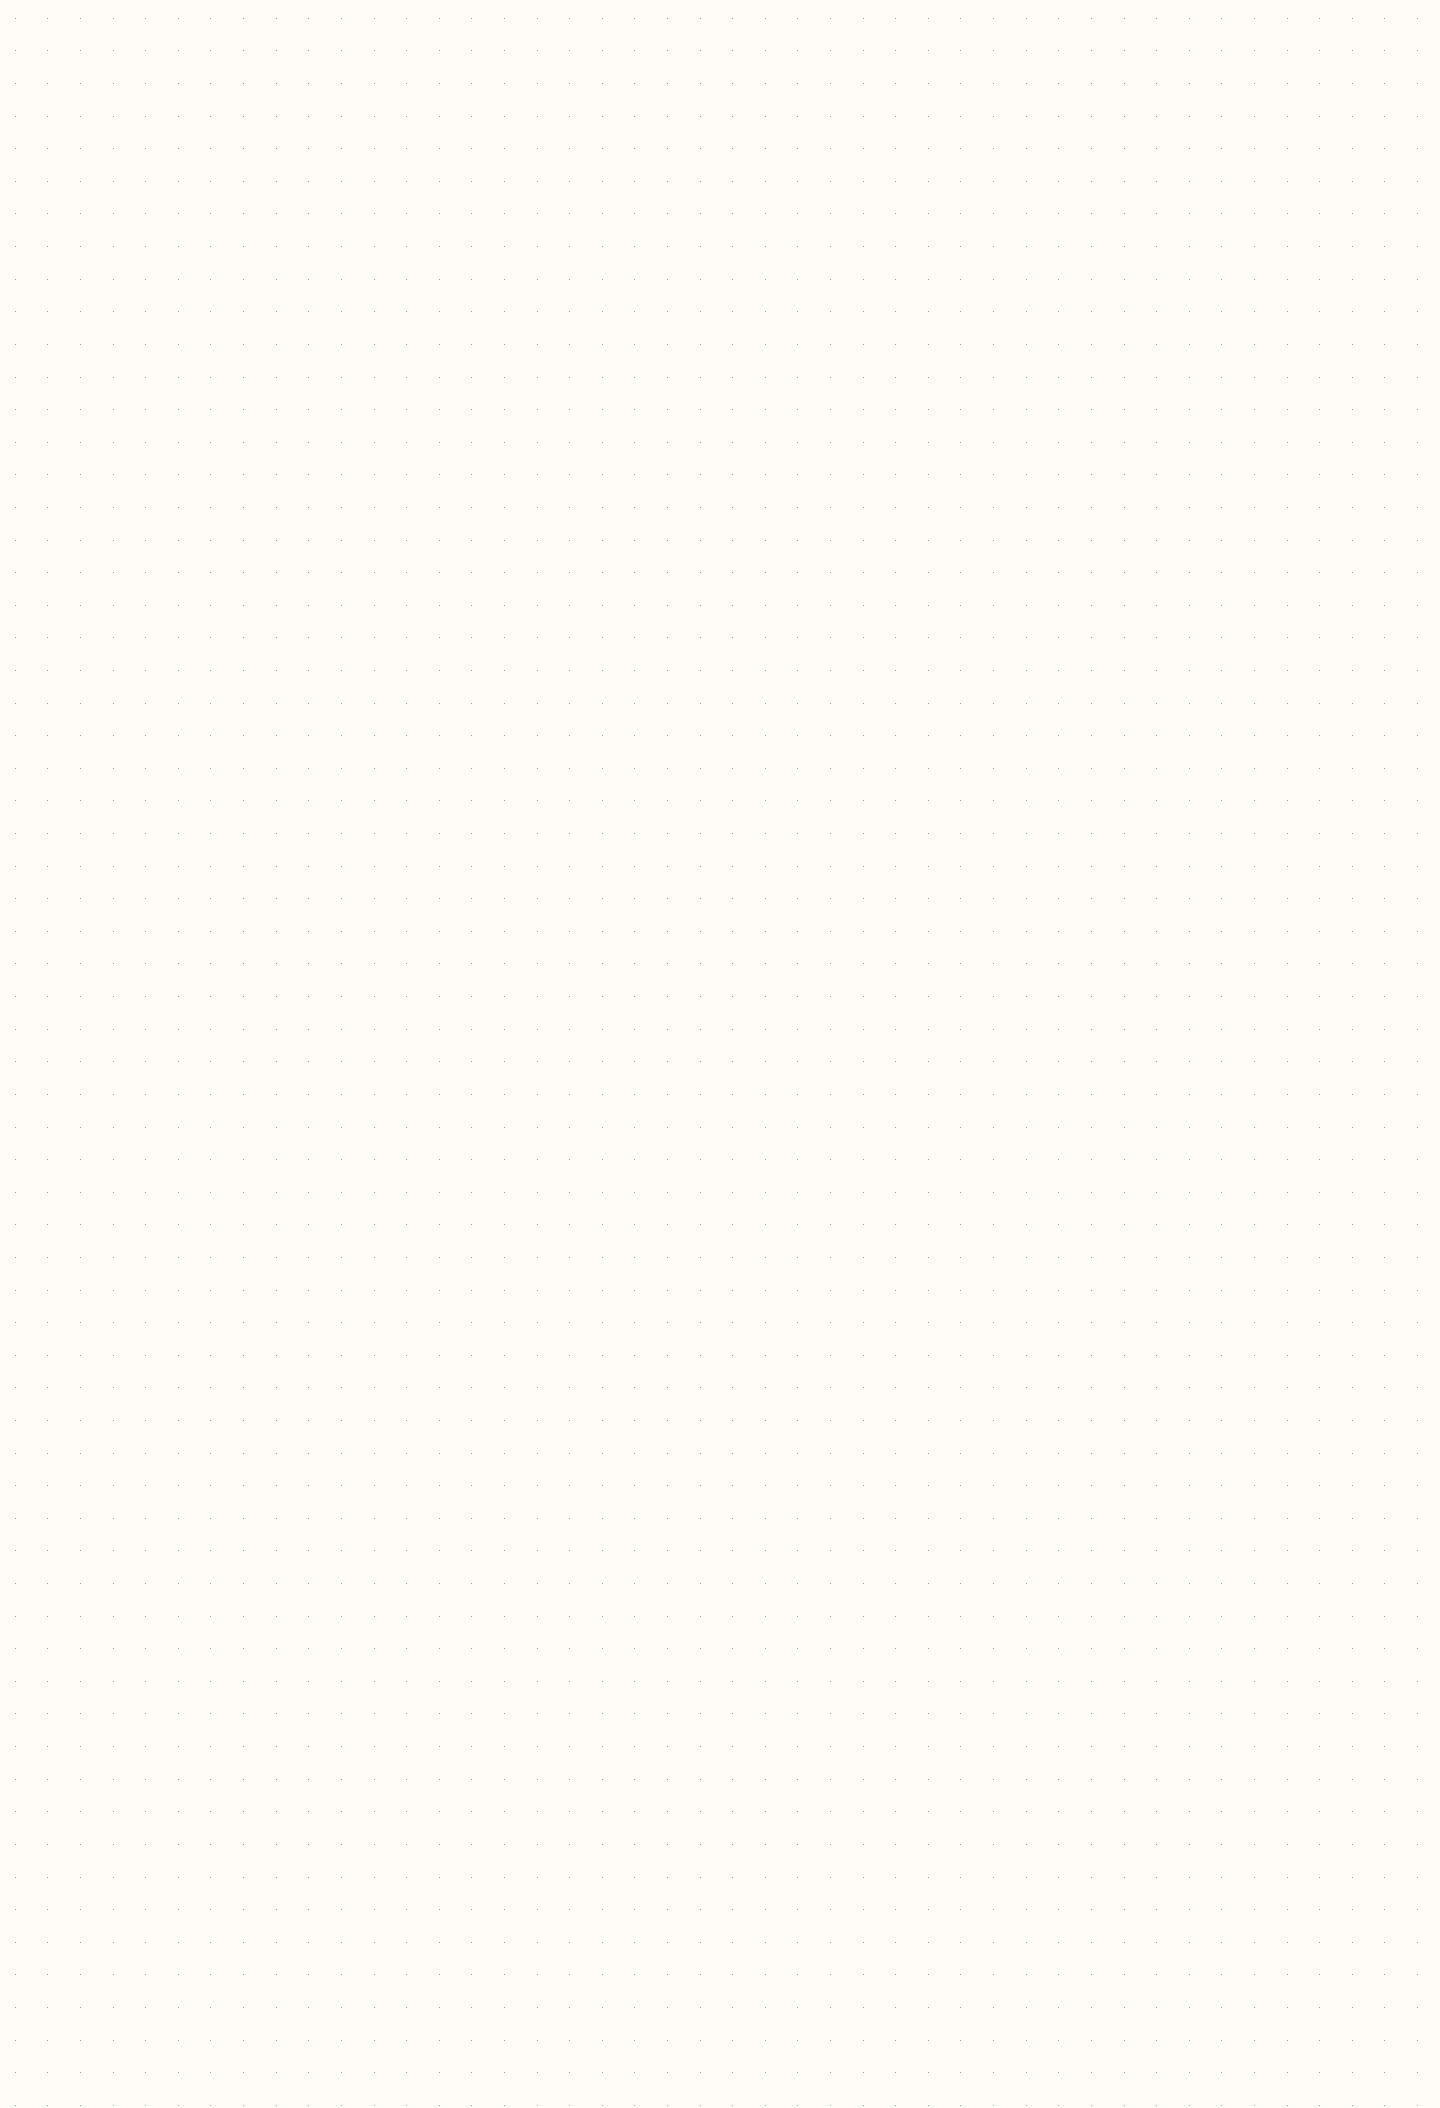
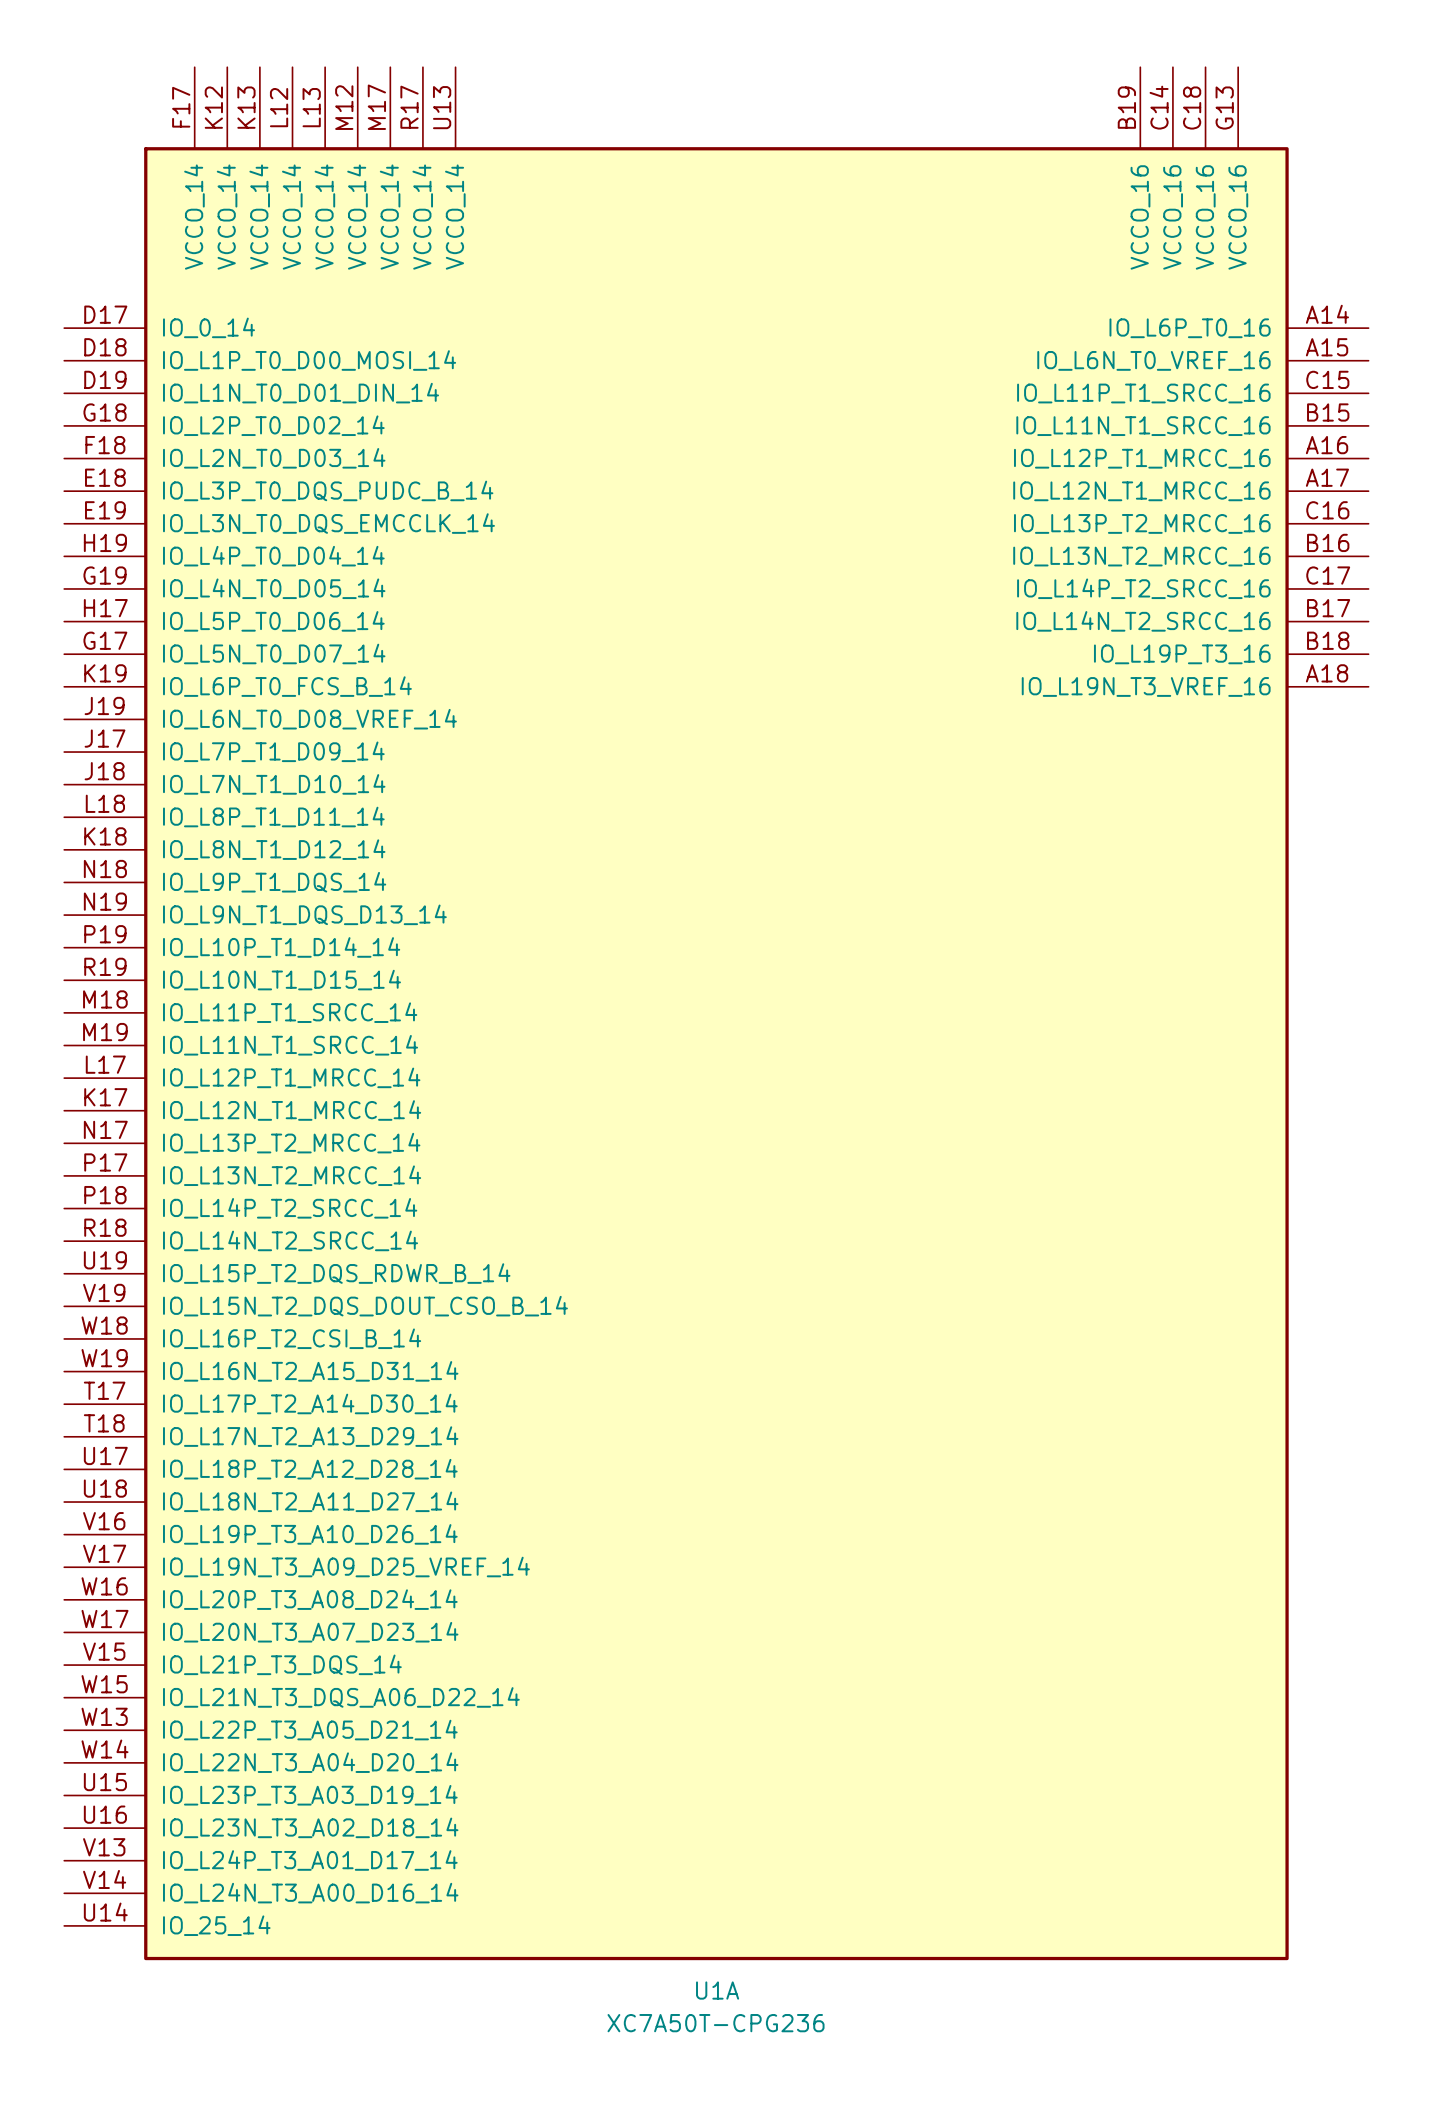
U1A: none -> XC7A50T-CPG236 (716, 1013)

